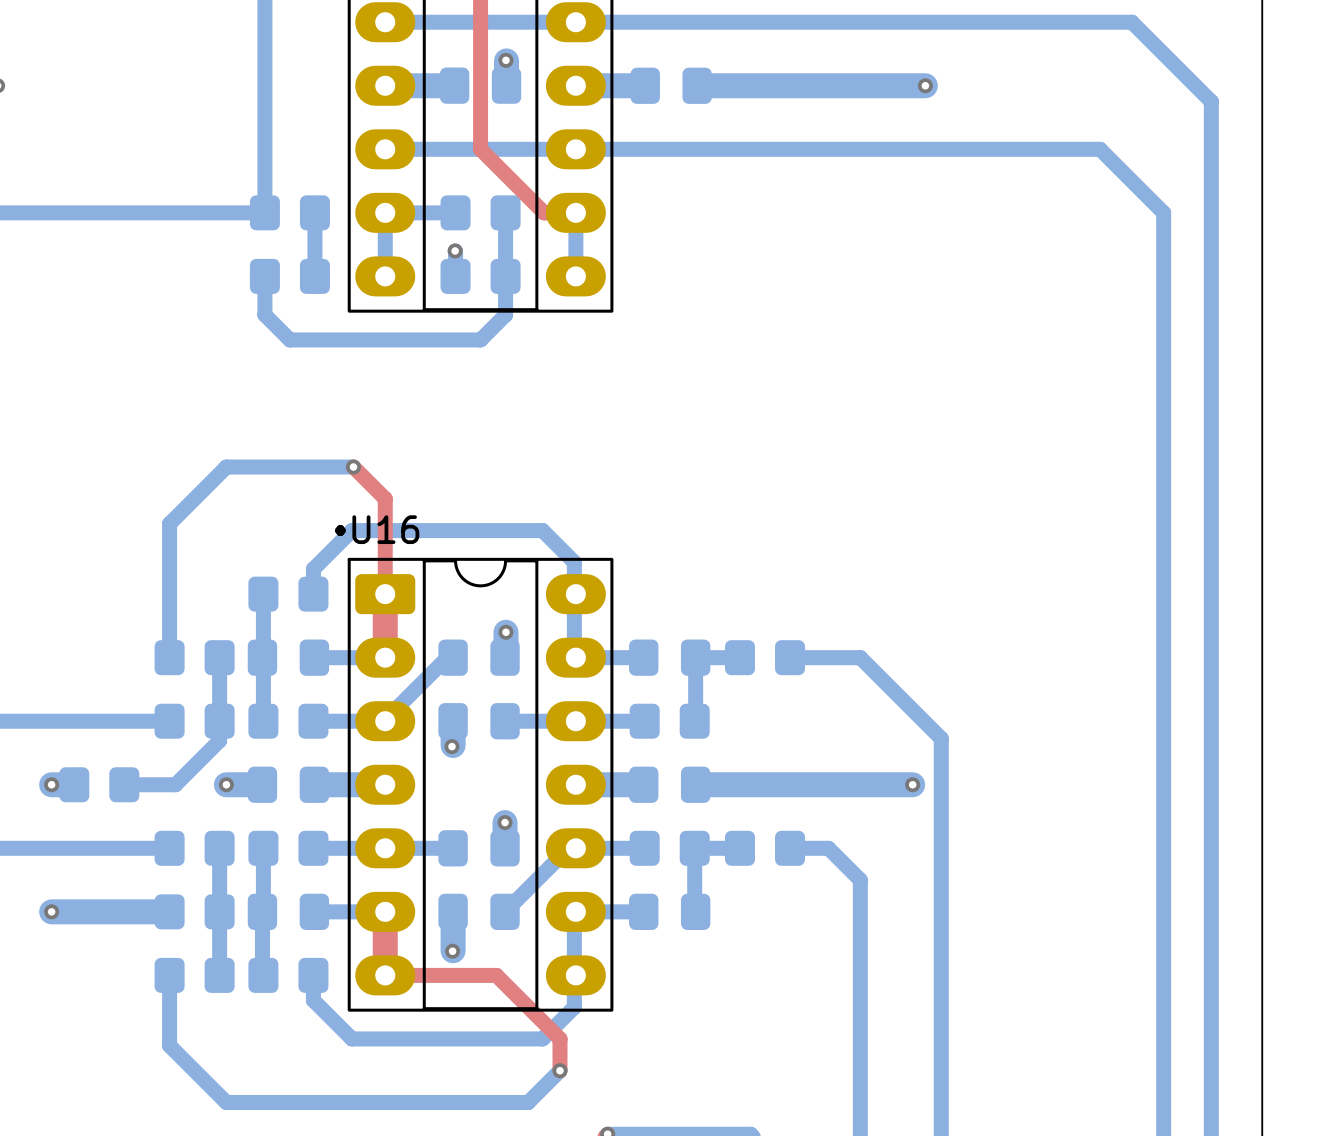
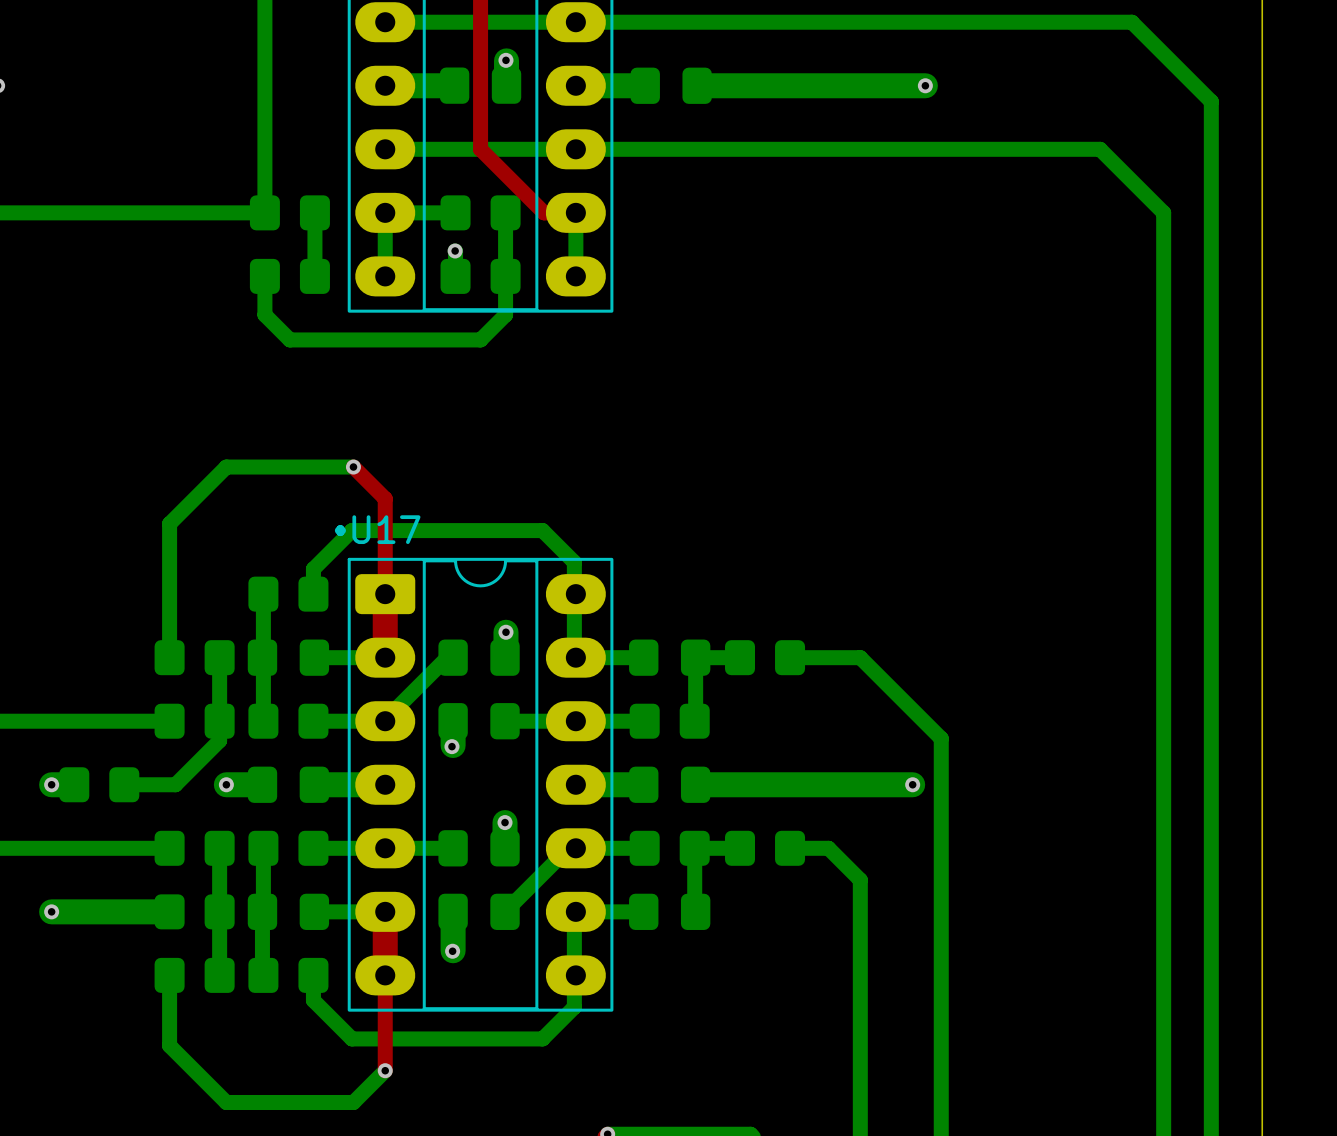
U16 name: U16 (385, 529) -> U17 (386, 529)
top track: (385, 975) (496, 975) (559, 1038) (559, 1070) -> (385, 975) (385, 1070)
via: none -> (385, 1070)
bottom track: (559, 1070) (528, 1102) (353, 1102) -> (385, 1070) (353, 1102)
via: (559, 1070) -> none

